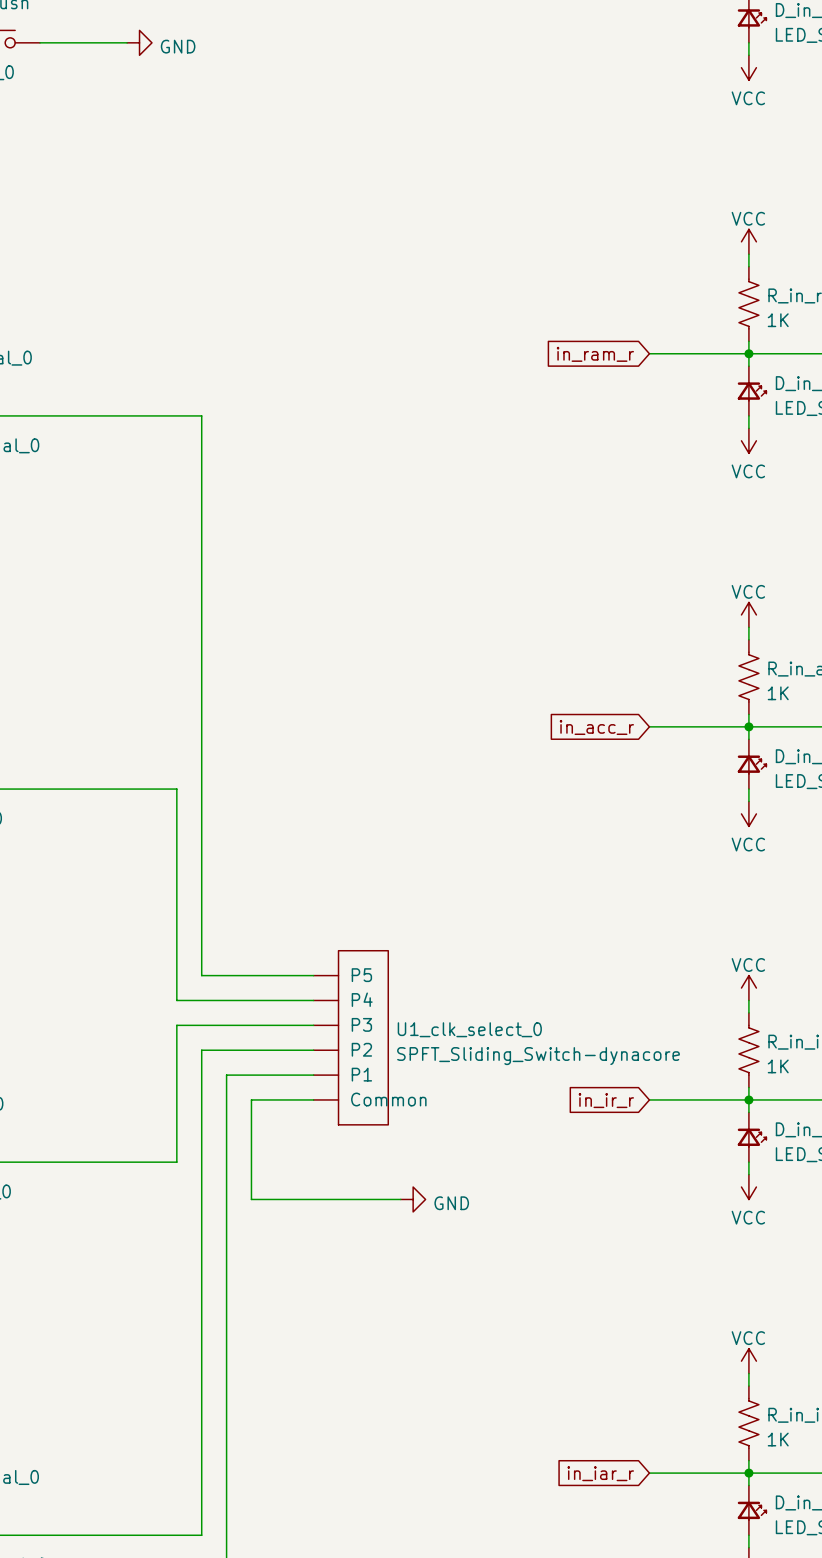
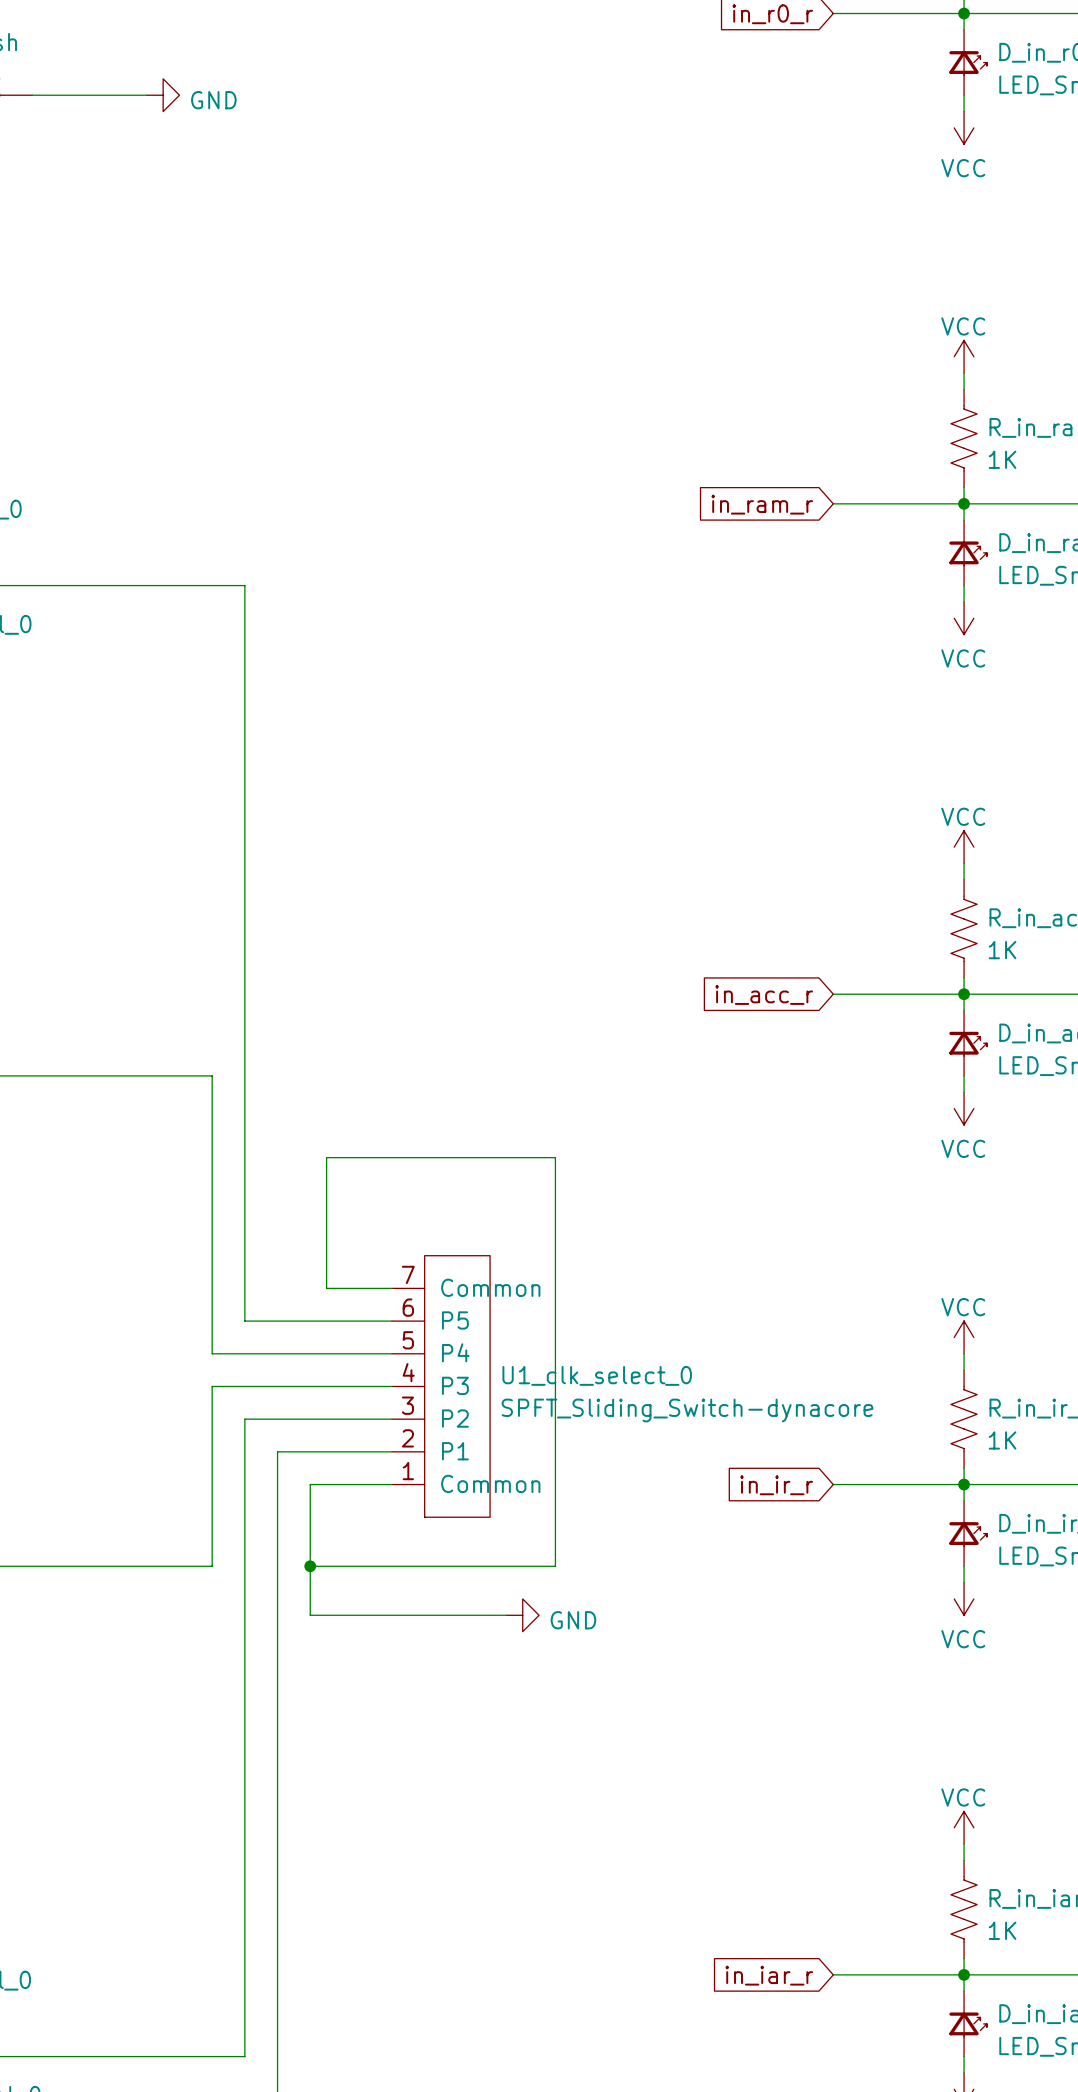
wire: none -> (391, 1288) (326, 1288) (326, 1157) (555, 1157) (555, 1566) (310, 1566)
U1_clk_select_0 symbol: [313, 950, 389, 1125] -> [391, 1255, 491, 1518]
junction: none -> (310, 1566)

